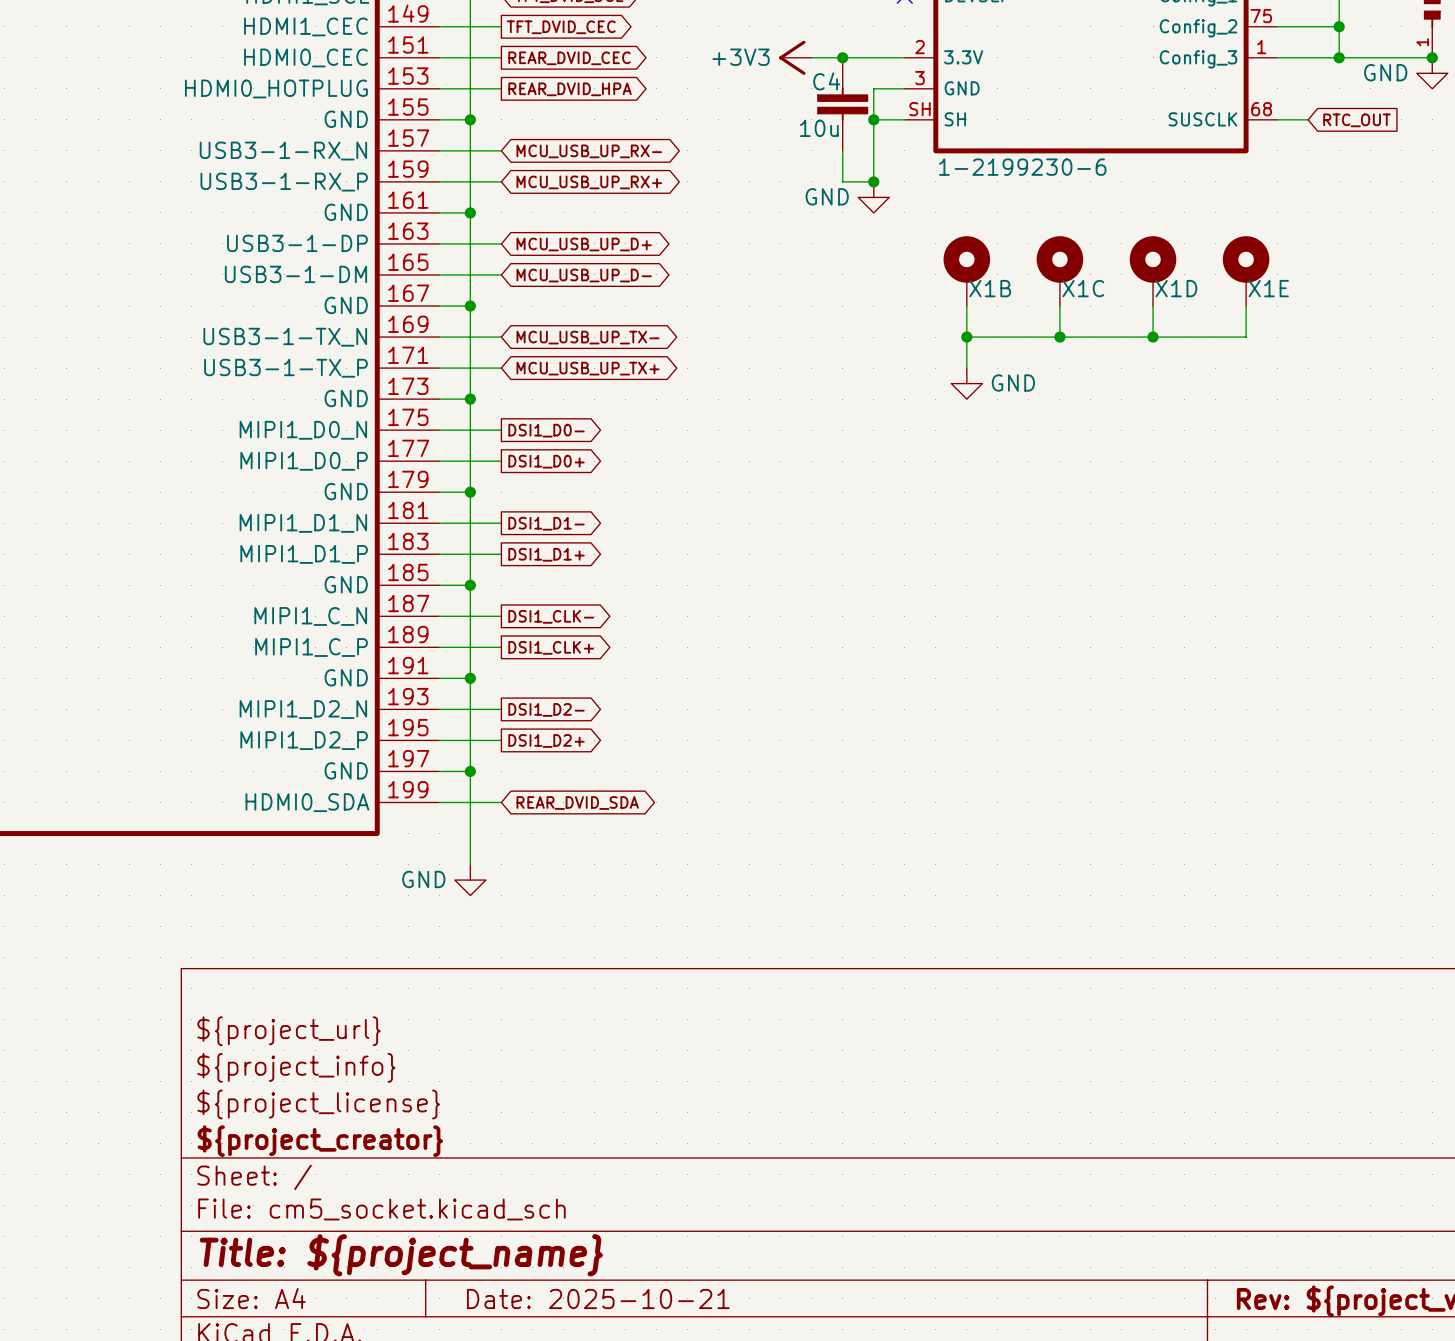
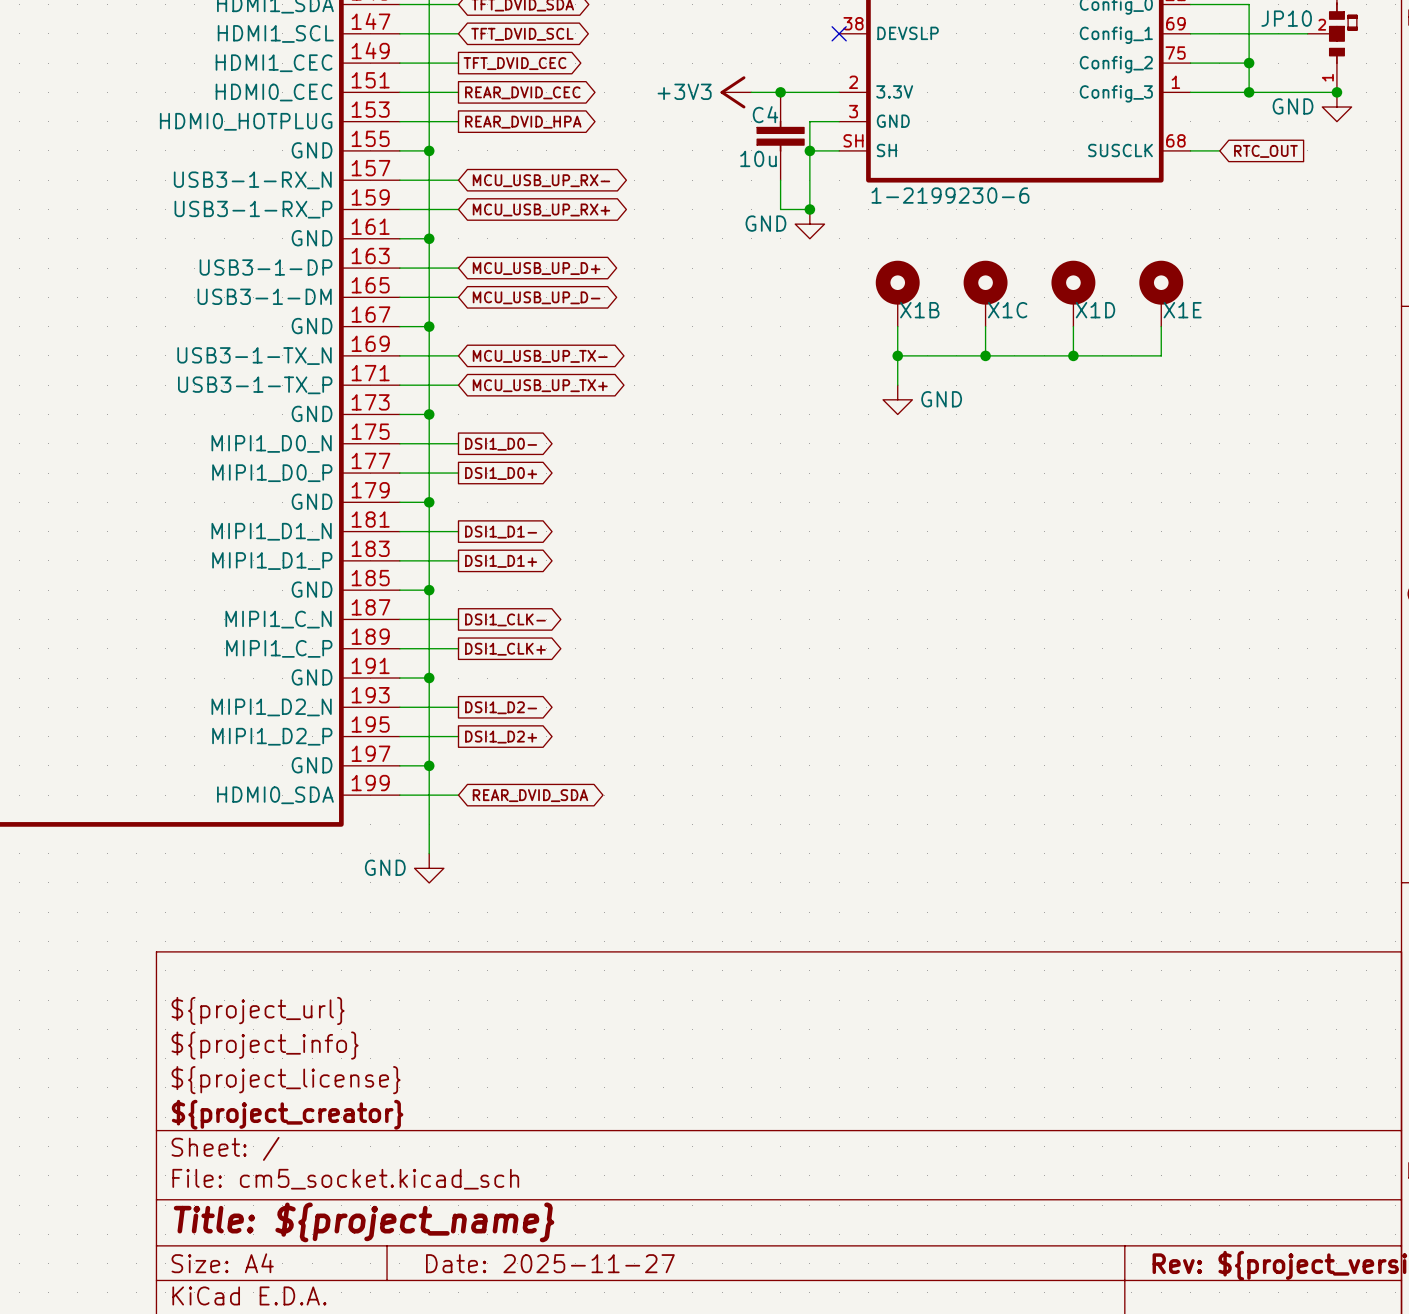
title block: Date: 2025-10-21 (598, 1298) -> Date: 2025-11-27 (550, 1263)

